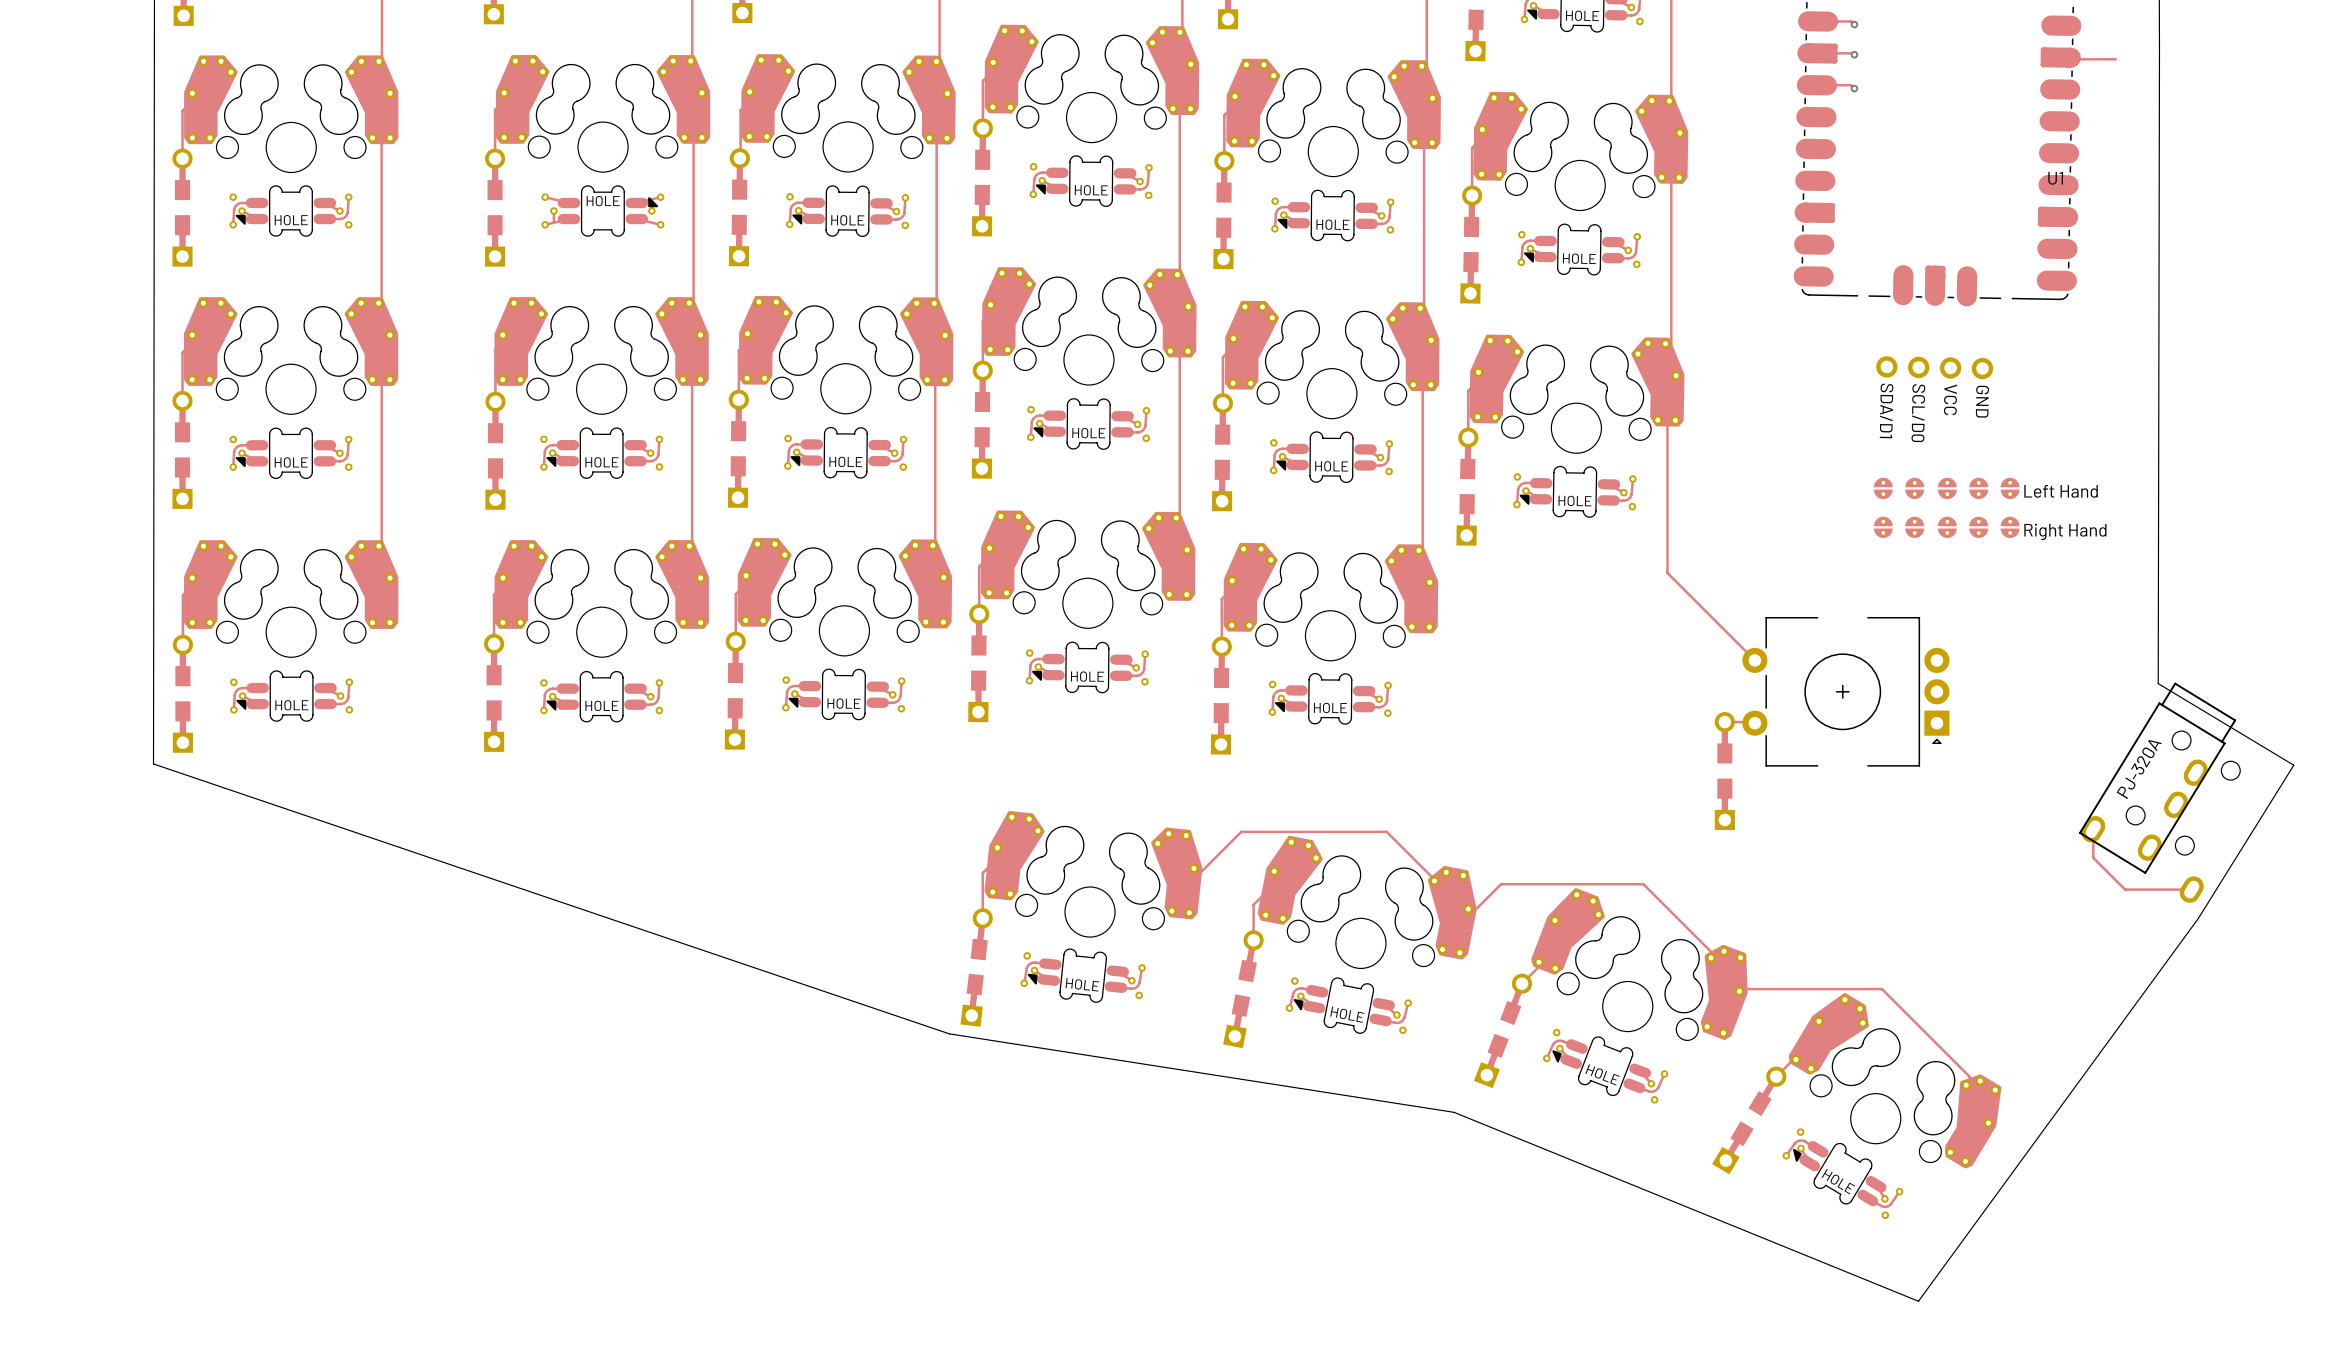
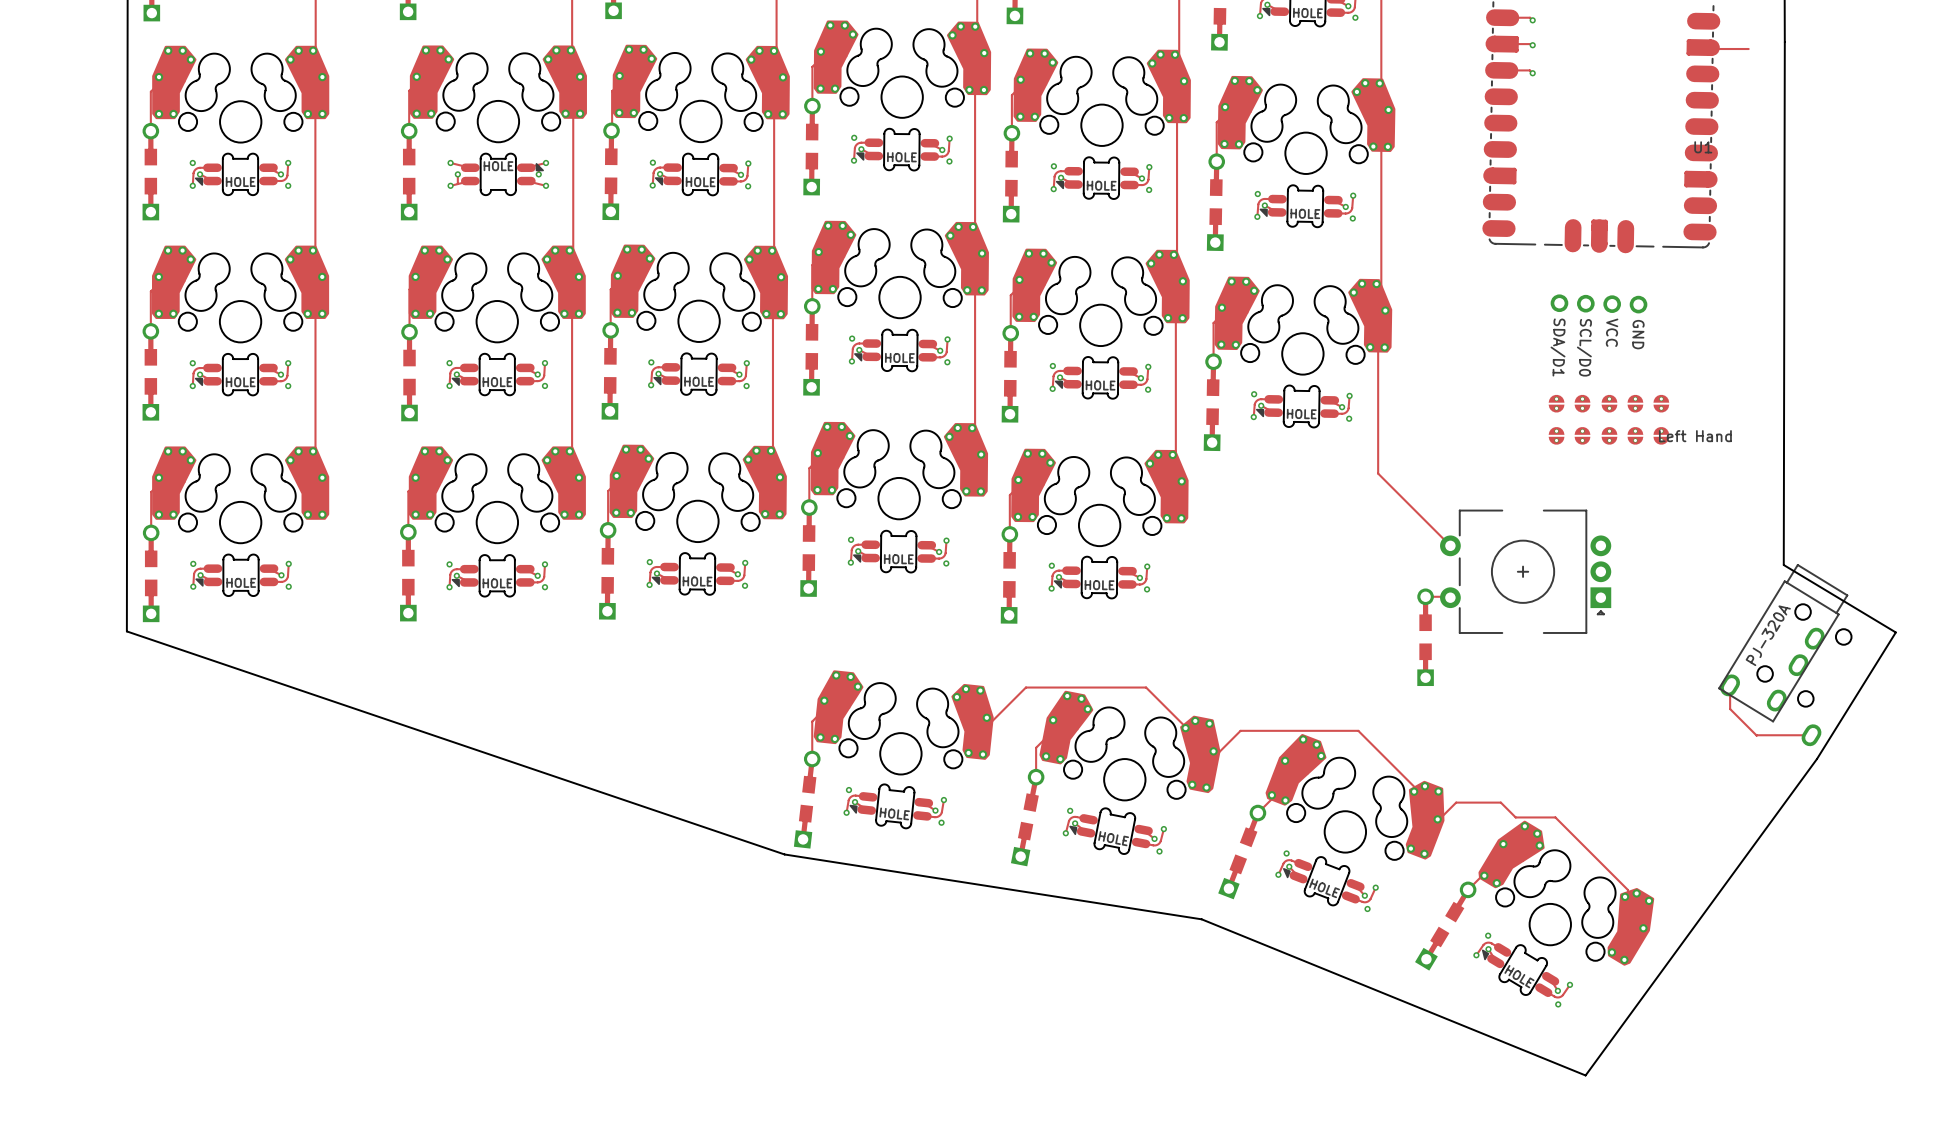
text position: Left Hand (2061, 491) -> Left Hand (1695, 436)
text: Right Hand (2065, 531) -> none
track: (1743, 989) (1833, 989) -> (1441, 817) (1456, 802) (1500, 802) (1515, 817)

